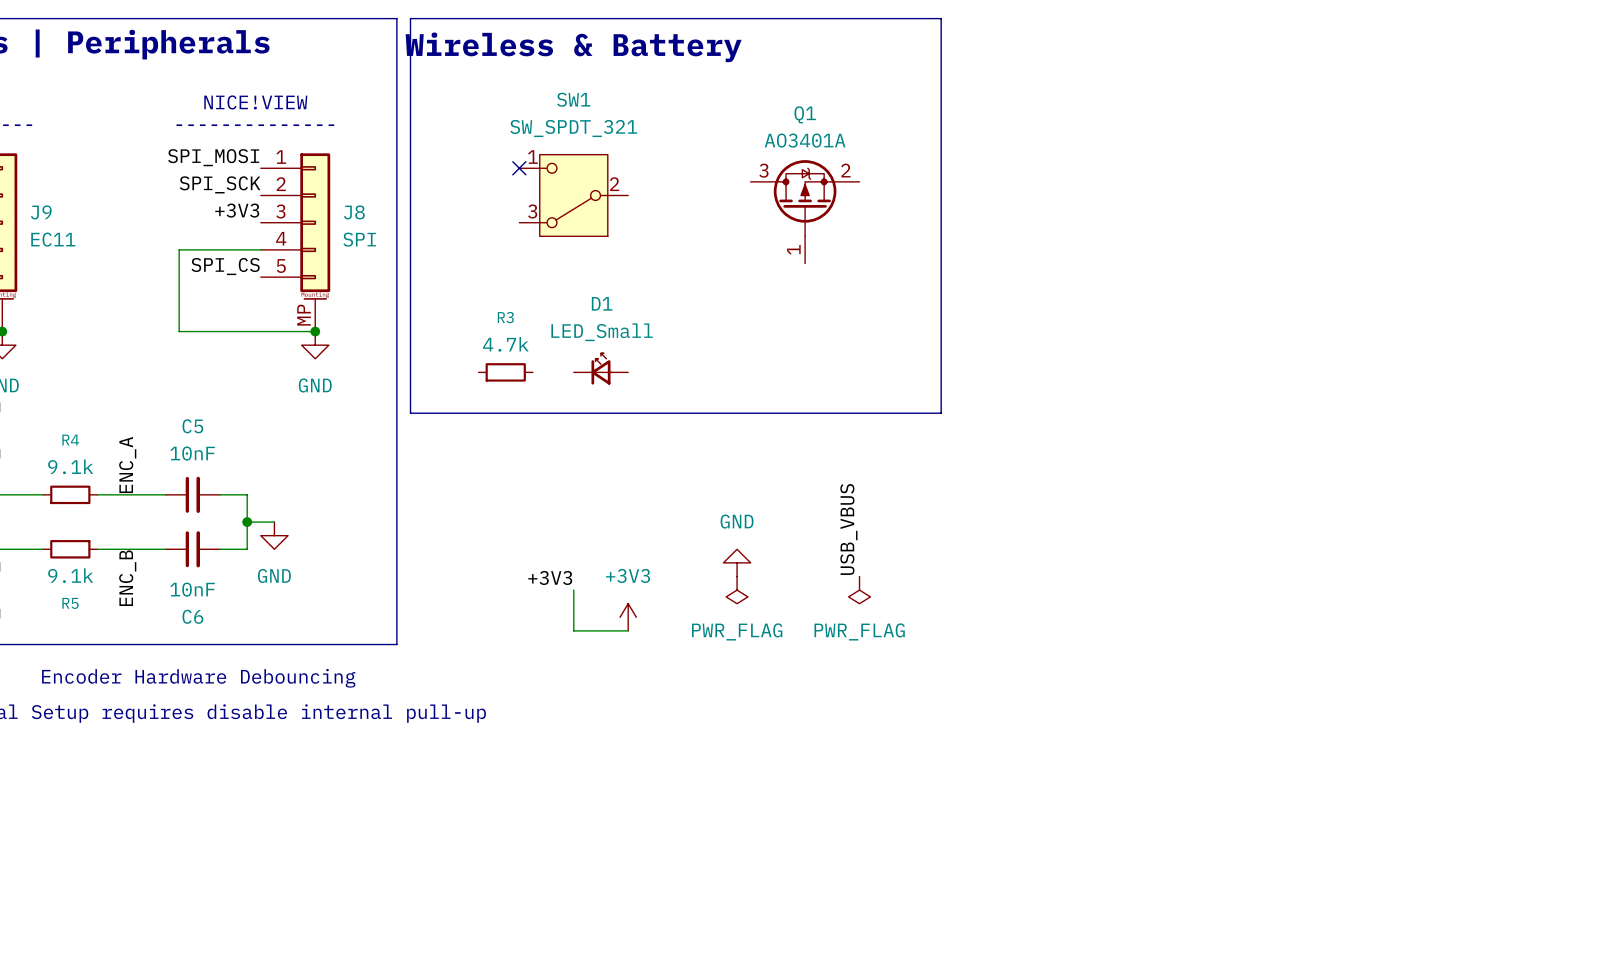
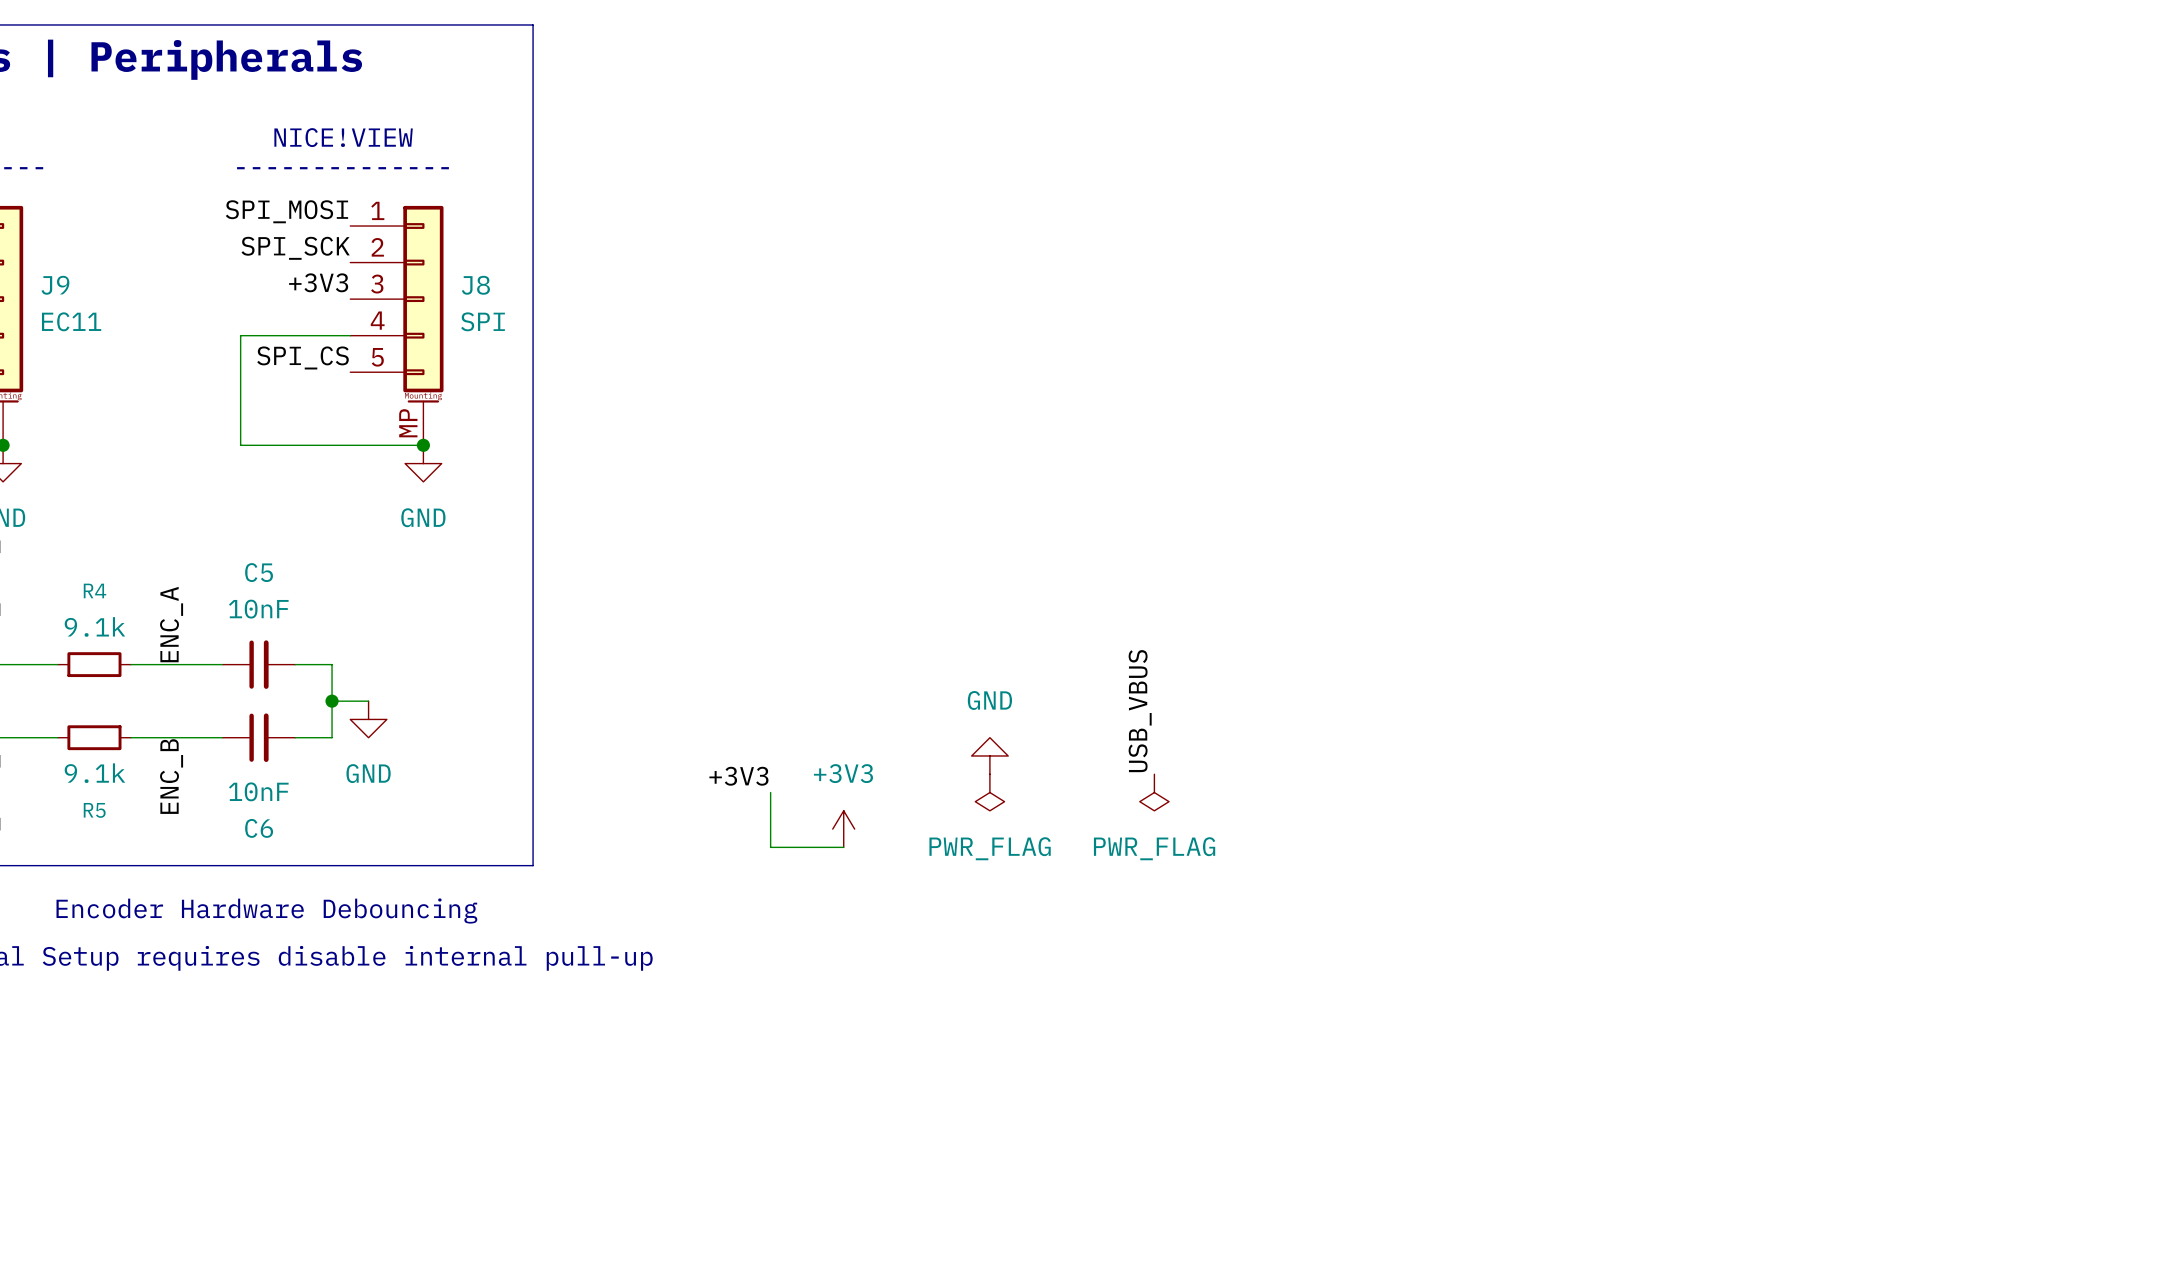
line: (410, 18) (941, 18) (941, 413) (410, 413) (410, 18) -> none
text: Wireless & Battery (573, 47) -> none
no-connect mark: (519, 168) -> none
SW1: SW_SPDT_321 (573, 195) -> none
Q1: AO3401A (805, 211) -> none
D1: LED_Small (600, 368) -> none
R3: 4.7k (505, 372) -> none

